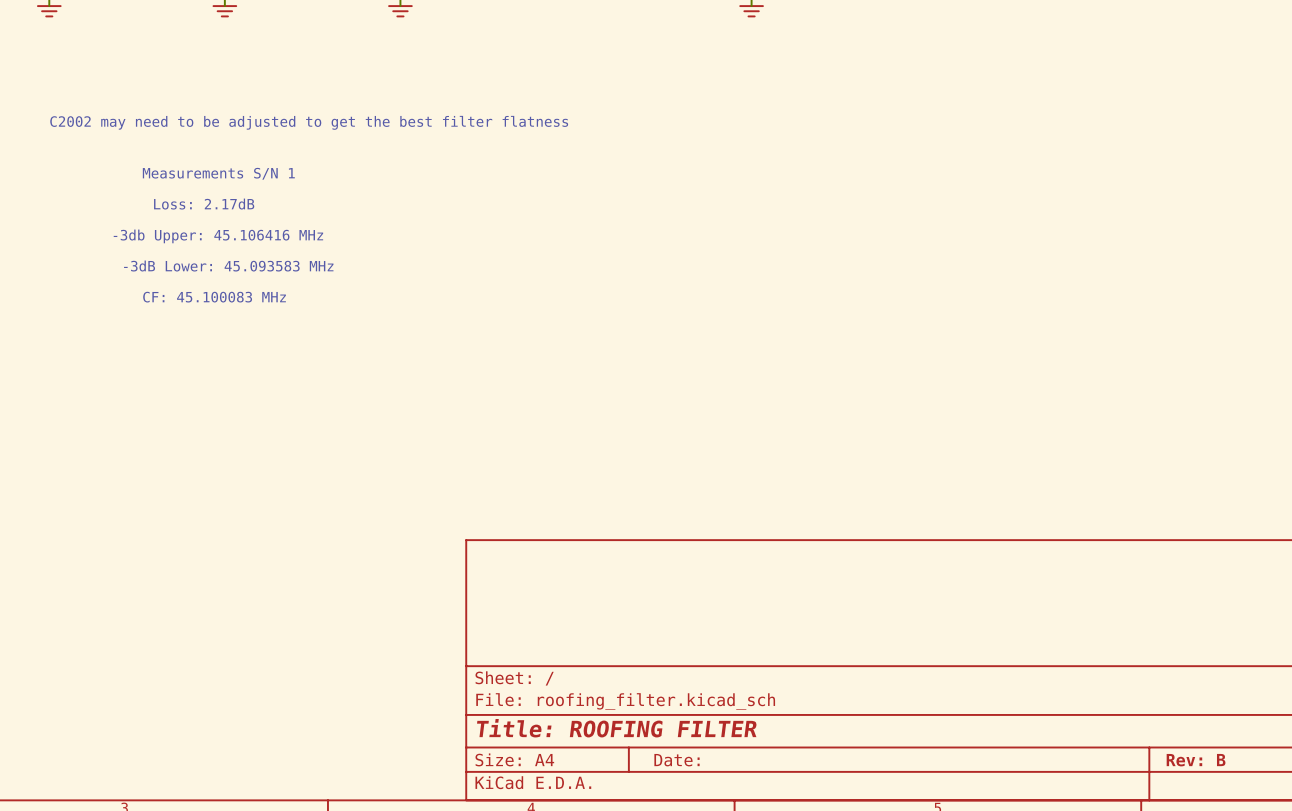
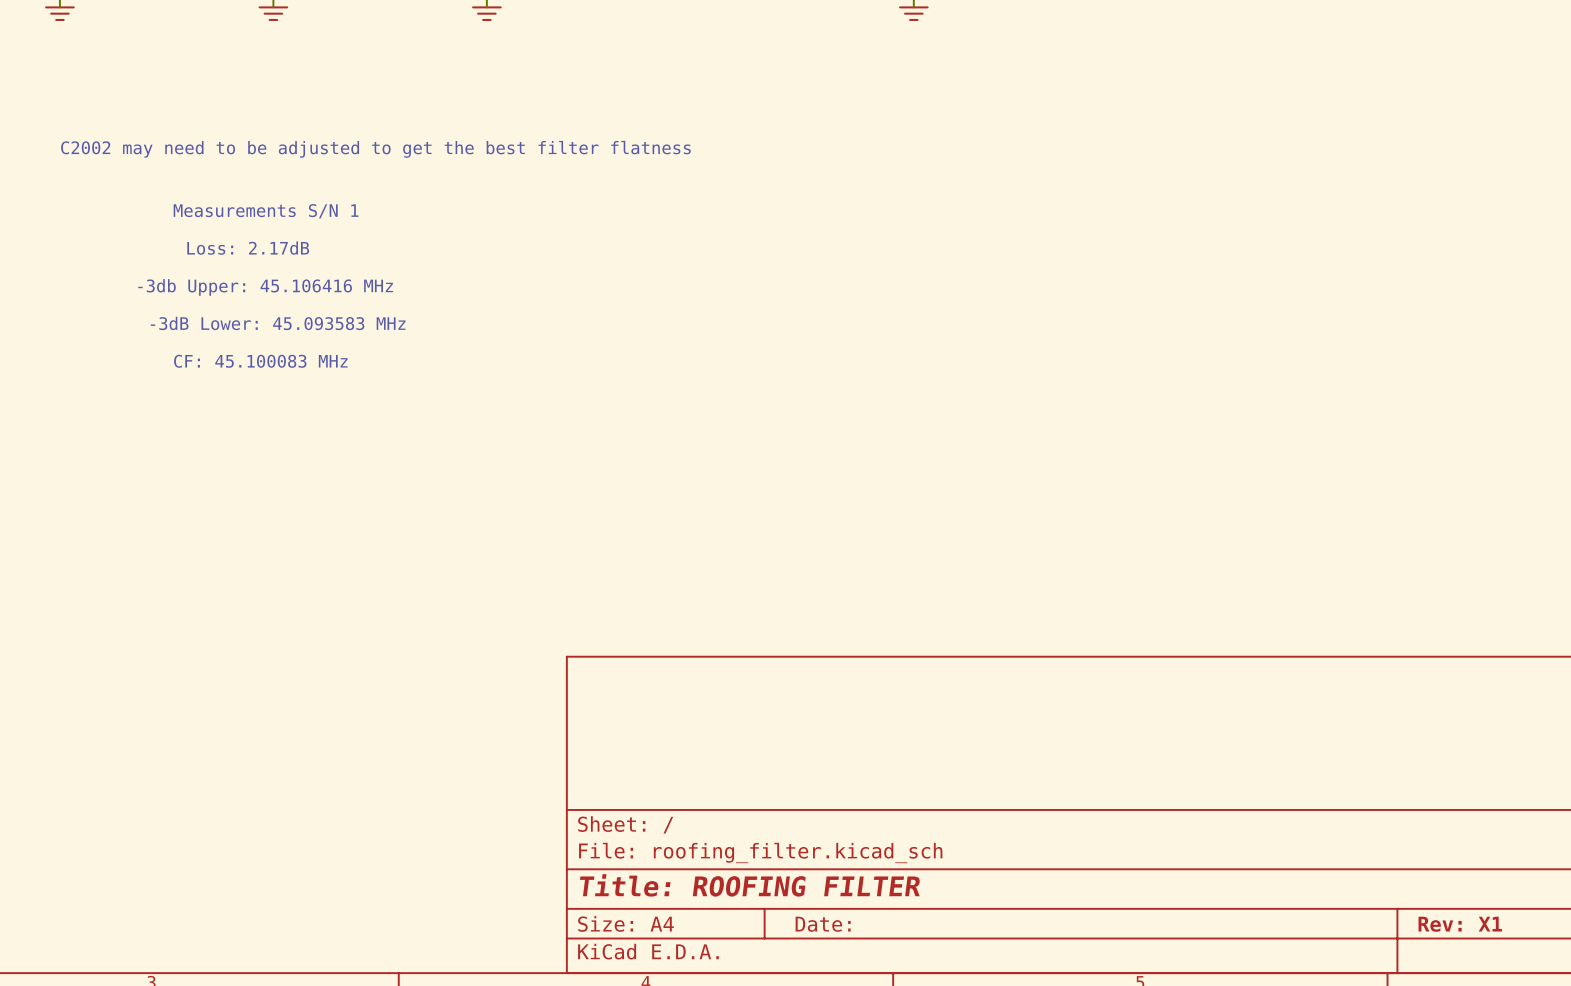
title block: Rev: B (1196, 760) -> Rev: X1 (1460, 924)

